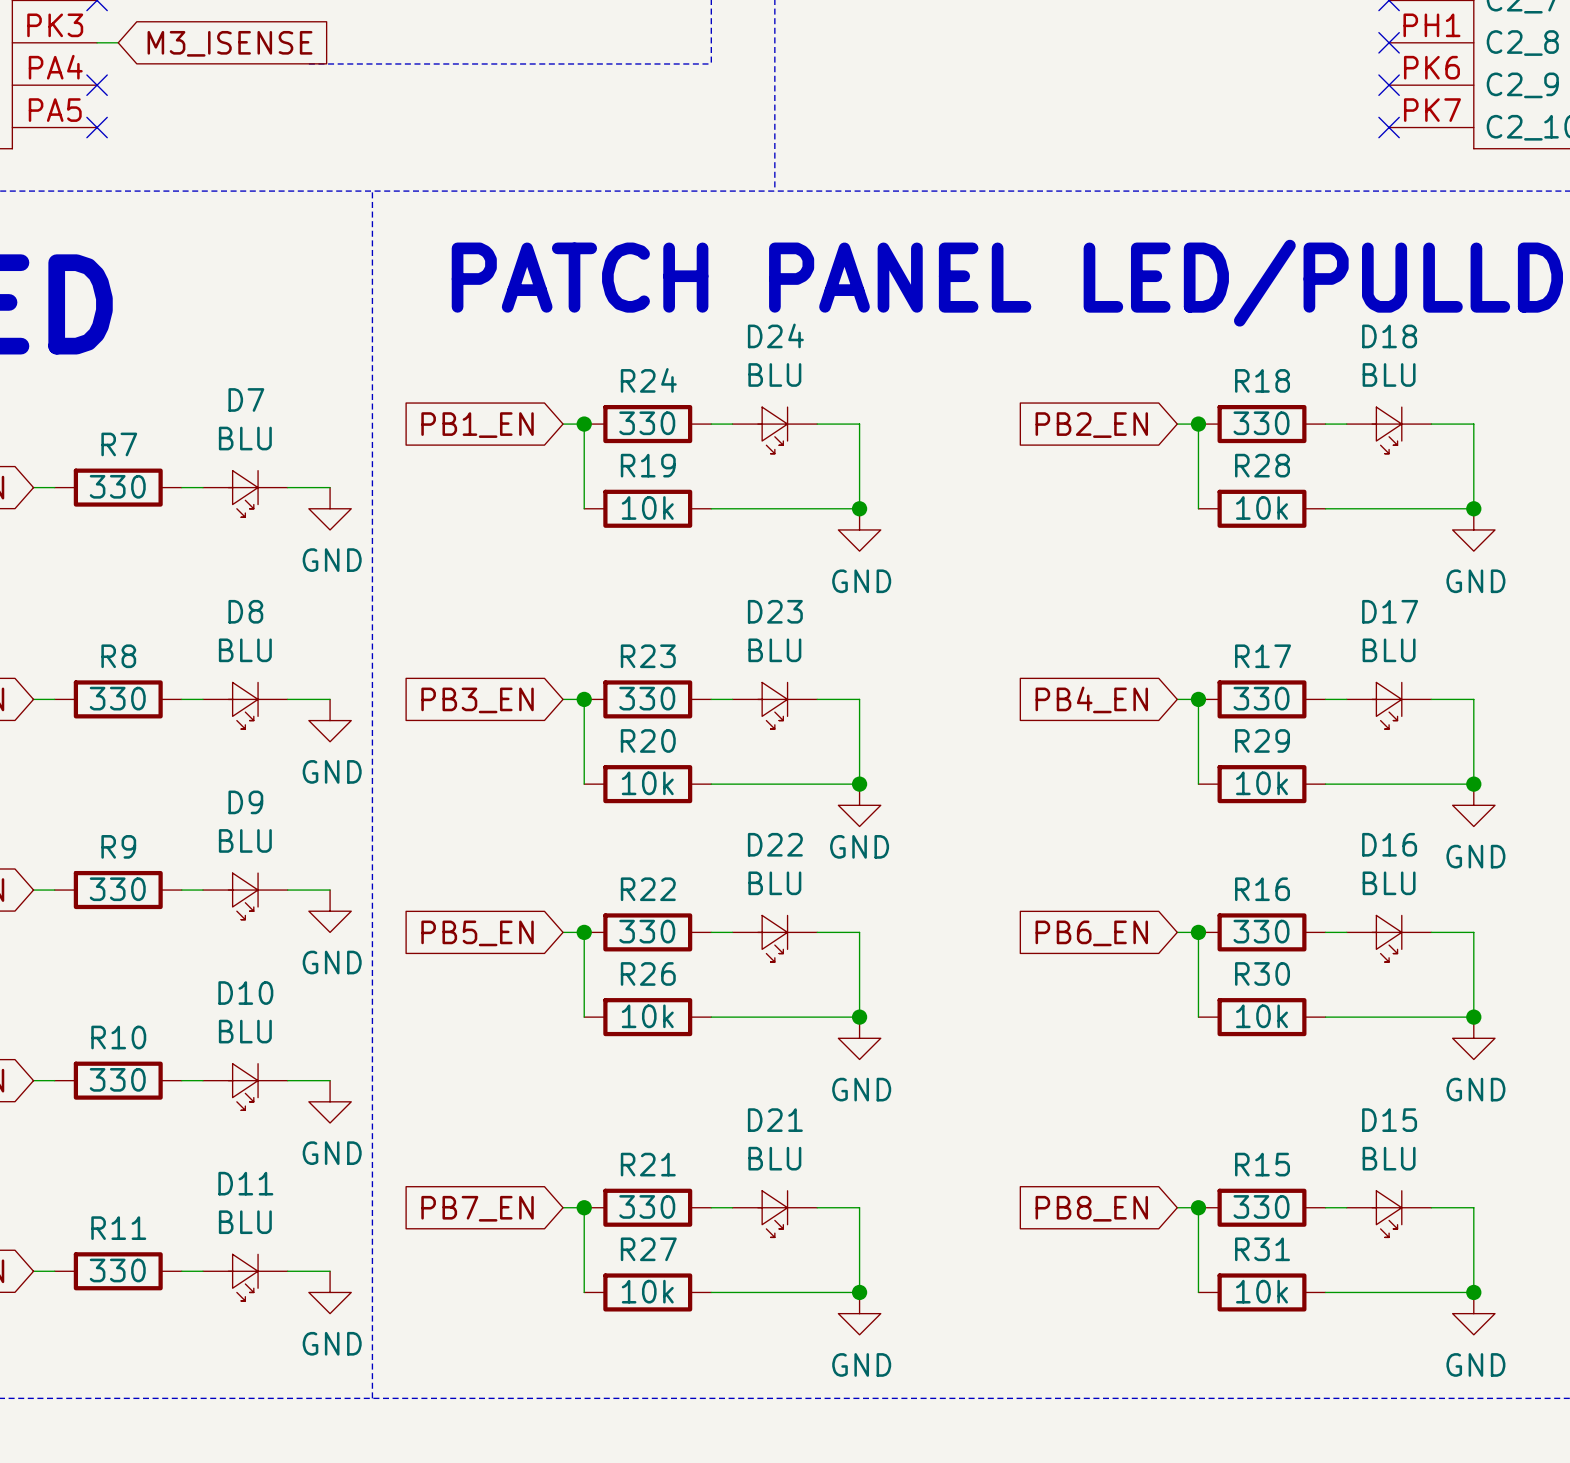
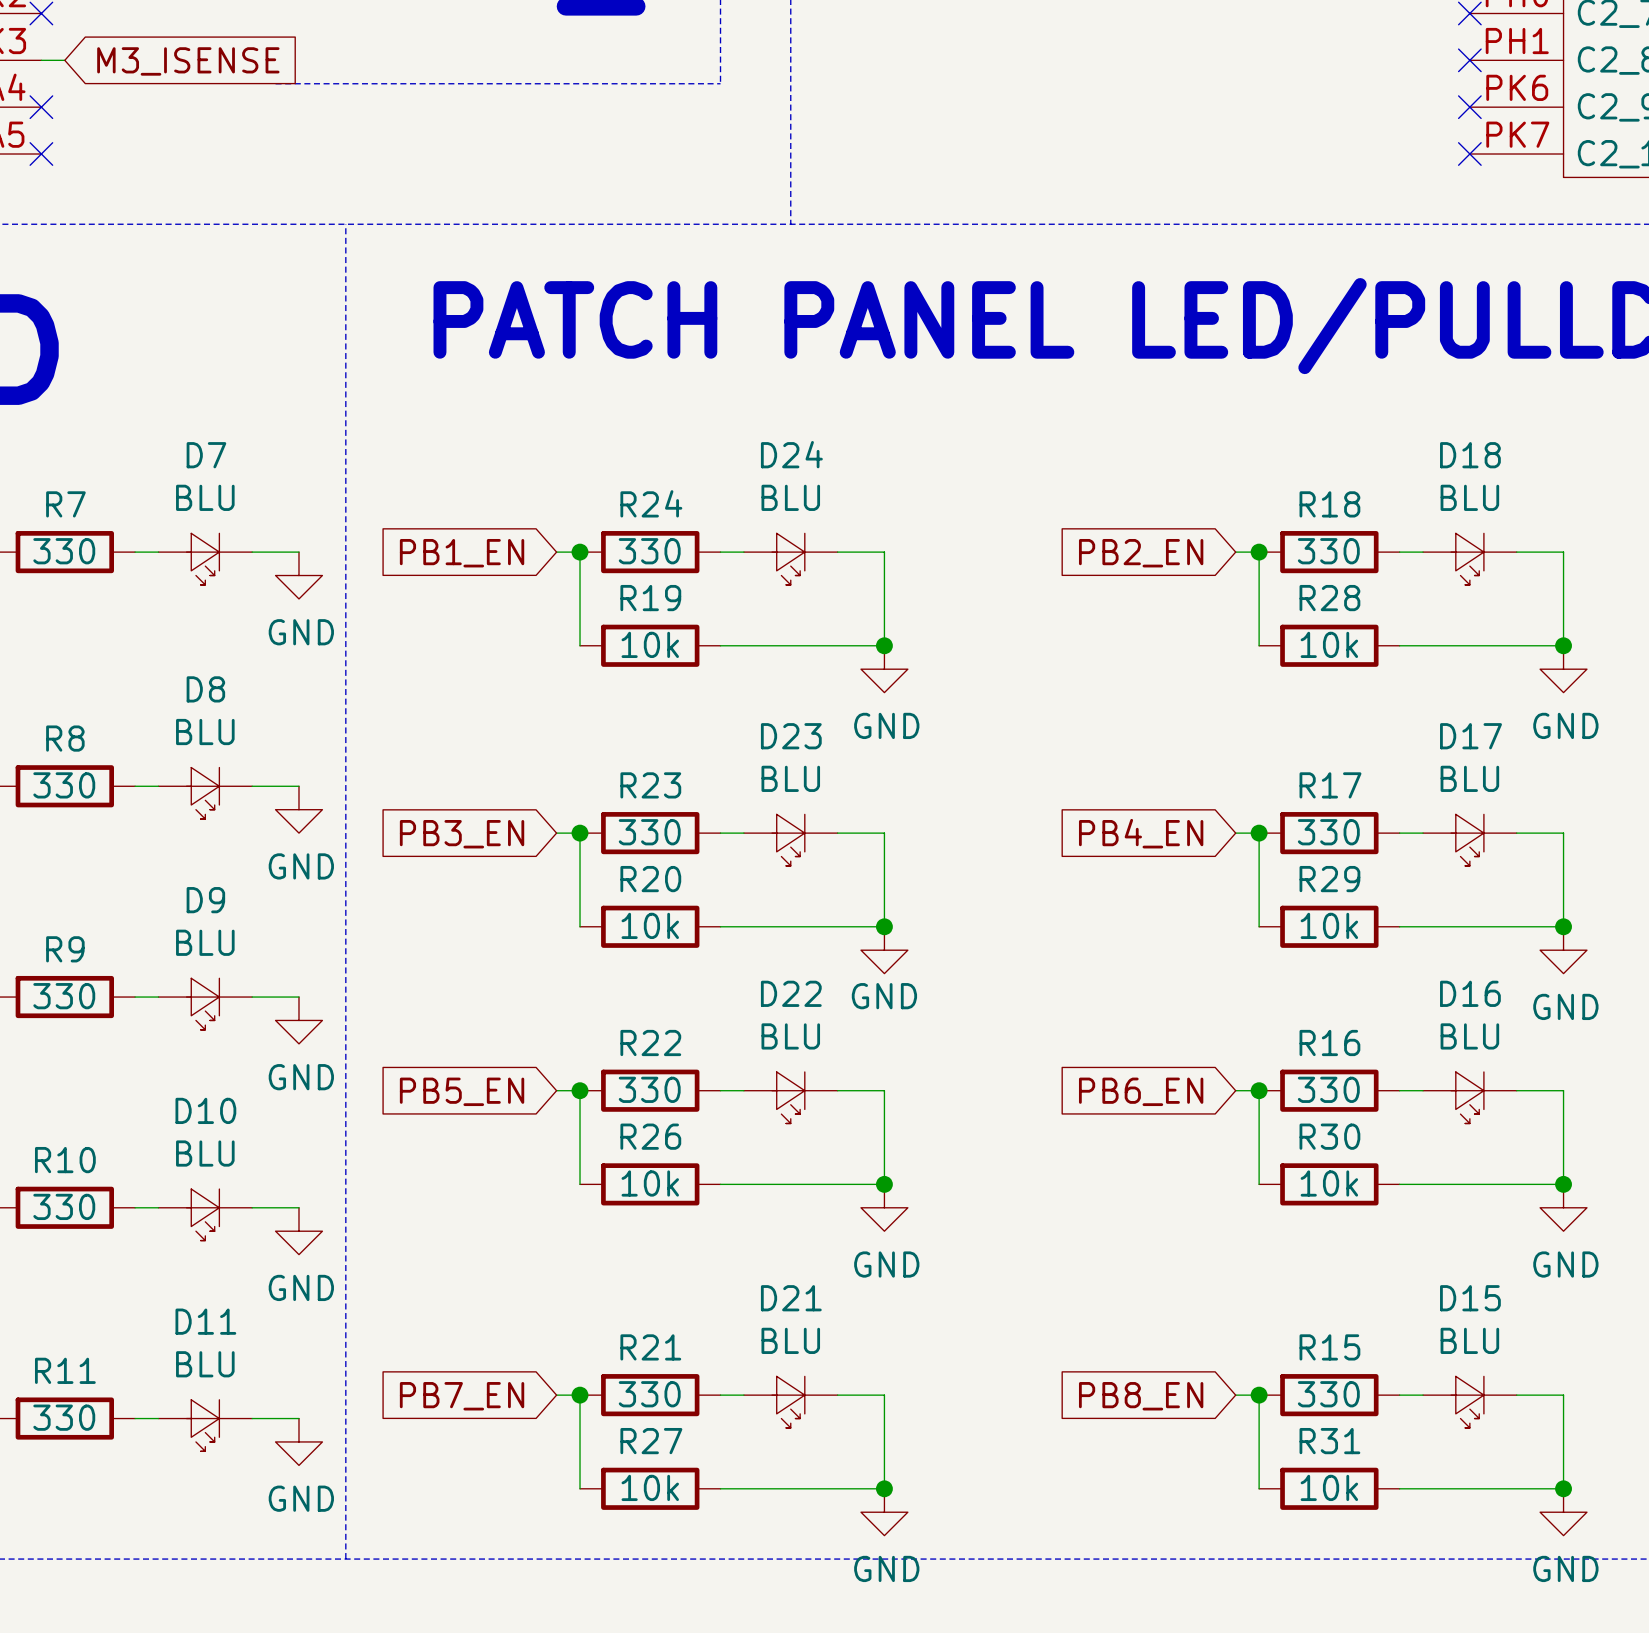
wire: (563, 424) (584, 424) (584, 487) -> (556, 552) (580, 552)
junction position: (584, 424) -> (580, 552)
R24 position: (647, 424) -> (650, 552)
wire: (711, 424) (732, 424) -> (720, 552) (743, 552)
wire: (817, 424) (859, 424) (859, 487) -> (837, 552) (884, 552)
wire: (1177, 424) (1198, 424) (1198, 487) -> (1235, 552) (1259, 552)
junction position: (1198, 424) -> (1259, 552)
R18 position: (1262, 424) -> (1329, 552)
wire: (1325, 424) (1346, 424) -> (1399, 552) (1423, 552)
wire: (1431, 424) (1473, 424) (1473, 487) -> (1516, 552) (1563, 552)
global label position: PB1_EN (477, 425) -> PB1_EN (462, 553)
global label position: PB2_EN (1091, 425) -> PB2_EN (1141, 553)
D24 position: (774, 430) -> (790, 559)
D18 position: (1389, 430) -> (1469, 559)
wire: none -> (580, 575) (580, 645)
R19 position: (647, 508) -> (650, 645)
wire: (711, 508) (859, 508) -> (720, 645) (884, 645) (884, 575)
junction position: (859, 508) -> (884, 645)
wire: none -> (1259, 575) (1259, 645)
R28 position: (1262, 508) -> (1329, 645)
wire: (1325, 508) (1473, 508) -> (1399, 645) (1563, 645) (1563, 575)
junction position: (1473, 508) -> (1563, 645)
power symbol position: GND (859, 529) -> GND (884, 669)
power symbol position: GND (1473, 529) -> GND (1563, 669)
wire: (563, 699) (584, 699) (584, 741) -> (556, 833) (580, 833)
junction position: (584, 699) -> (580, 833)
R23 position: (647, 699) -> (650, 833)
wire: (711, 699) (732, 699) -> (720, 833) (743, 833)
wire: (817, 699) (859, 699) (859, 741) -> (837, 833) (884, 833)
global label position: PB4_EN (1091, 699) -> PB4_EN (1141, 833)
wire: (1177, 699) (1198, 699) (1198, 741) -> (1235, 833) (1259, 833)
junction position: (1198, 699) -> (1259, 833)
R17 position: (1262, 699) -> (1329, 833)
wire: (1325, 699) (1346, 699) -> (1399, 833) (1423, 833)
wire: (1431, 699) (1473, 699) (1473, 741) -> (1516, 833) (1563, 833)
global label position: PB3_EN (477, 700) -> PB3_EN (462, 834)
D23 position: (774, 705) -> (790, 840)
D17 position: (1389, 705) -> (1469, 840)
wire: none -> (580, 879) (580, 926)
R20 position: (647, 784) -> (650, 926)
wire: (711, 784) (859, 784) -> (720, 926) (884, 926) (884, 879)
junction position: (859, 784) -> (884, 926)
wire: none -> (1259, 879) (1259, 926)
R29 position: (1262, 784) -> (1329, 926)
wire: (1325, 784) (1473, 784) -> (1399, 926) (1563, 926) (1563, 879)
junction position: (1473, 784) -> (1563, 926)
power symbol position: GND (859, 805) -> GND (884, 950)
power symbol position: GND (1473, 805) -> GND (1563, 950)
wire: (563, 932) (584, 932) (584, 974) -> (556, 1090) (580, 1090)
junction position: (584, 932) -> (580, 1090)
R22 position: (647, 932) -> (650, 1090)
wire: (711, 932) (732, 932) -> (720, 1090) (743, 1090)
wire: (817, 932) (859, 932) (859, 974) -> (837, 1090) (884, 1090)
wire: (1177, 932) (1198, 932) (1198, 974) -> (1235, 1090) (1259, 1090)
junction position: (1198, 932) -> (1259, 1090)
R16 position: (1262, 932) -> (1329, 1090)
wire: (1325, 932) (1346, 932) -> (1399, 1090) (1423, 1090)
wire: (1431, 932) (1473, 932) (1473, 974) -> (1516, 1090) (1563, 1090)
global label position: PB5_EN (477, 933) -> PB5_EN (462, 1091)
global label position: PB6_EN (1091, 933) -> PB6_EN (1141, 1091)
D22 position: (774, 938) -> (790, 1097)
D16 position: (1389, 938) -> (1469, 1097)
wire: none -> (580, 1137) (580, 1184)
R26 position: (647, 1017) -> (650, 1184)
wire: (711, 1017) (859, 1017) -> (720, 1184) (884, 1184) (884, 1137)
junction position: (859, 1017) -> (884, 1184)
wire: none -> (1259, 1137) (1259, 1184)
R30 position: (1262, 1017) -> (1329, 1184)
wire: (1325, 1017) (1473, 1017) -> (1399, 1184) (1563, 1184) (1563, 1137)
junction position: (1473, 1017) -> (1563, 1184)
power symbol position: GND (859, 1038) -> GND (884, 1207)
power symbol position: GND (1473, 1038) -> GND (1563, 1207)
wire: (563, 1207) (584, 1207) (584, 1250) -> (556, 1395) (580, 1395)
junction position: (584, 1207) -> (580, 1395)
R21 position: (647, 1207) -> (650, 1395)
wire: (711, 1207) (732, 1207) -> (720, 1395) (743, 1395)
wire: (817, 1207) (859, 1207) (859, 1250) -> (837, 1395) (884, 1395)
wire: (1177, 1207) (1198, 1207) (1198, 1250) -> (1235, 1395) (1259, 1395)
junction position: (1198, 1207) -> (1259, 1395)
R15 position: (1262, 1207) -> (1329, 1395)
wire: (1325, 1207) (1346, 1207) -> (1399, 1395) (1423, 1395)
wire: (1431, 1207) (1473, 1207) (1473, 1250) -> (1516, 1395) (1563, 1395)
global label position: PB7_EN (477, 1208) -> PB7_EN (462, 1396)
global label position: PB8_EN (1091, 1208) -> PB8_EN (1141, 1396)
D21 position: (774, 1214) -> (790, 1402)
D15 position: (1389, 1214) -> (1469, 1402)
wire: none -> (580, 1441) (580, 1488)
R27 position: (647, 1292) -> (650, 1488)
wire: (711, 1292) (859, 1292) -> (720, 1488) (884, 1488) (884, 1441)
junction position: (859, 1292) -> (884, 1488)
wire: none -> (1259, 1441) (1259, 1488)
R31 position: (1262, 1292) -> (1329, 1488)
wire: (1325, 1292) (1473, 1292) -> (1399, 1488) (1563, 1488) (1563, 1441)
junction position: (1473, 1292) -> (1563, 1488)
power symbol position: GND (859, 1313) -> GND (884, 1512)
power symbol position: GND (1473, 1313) -> GND (1563, 1512)

